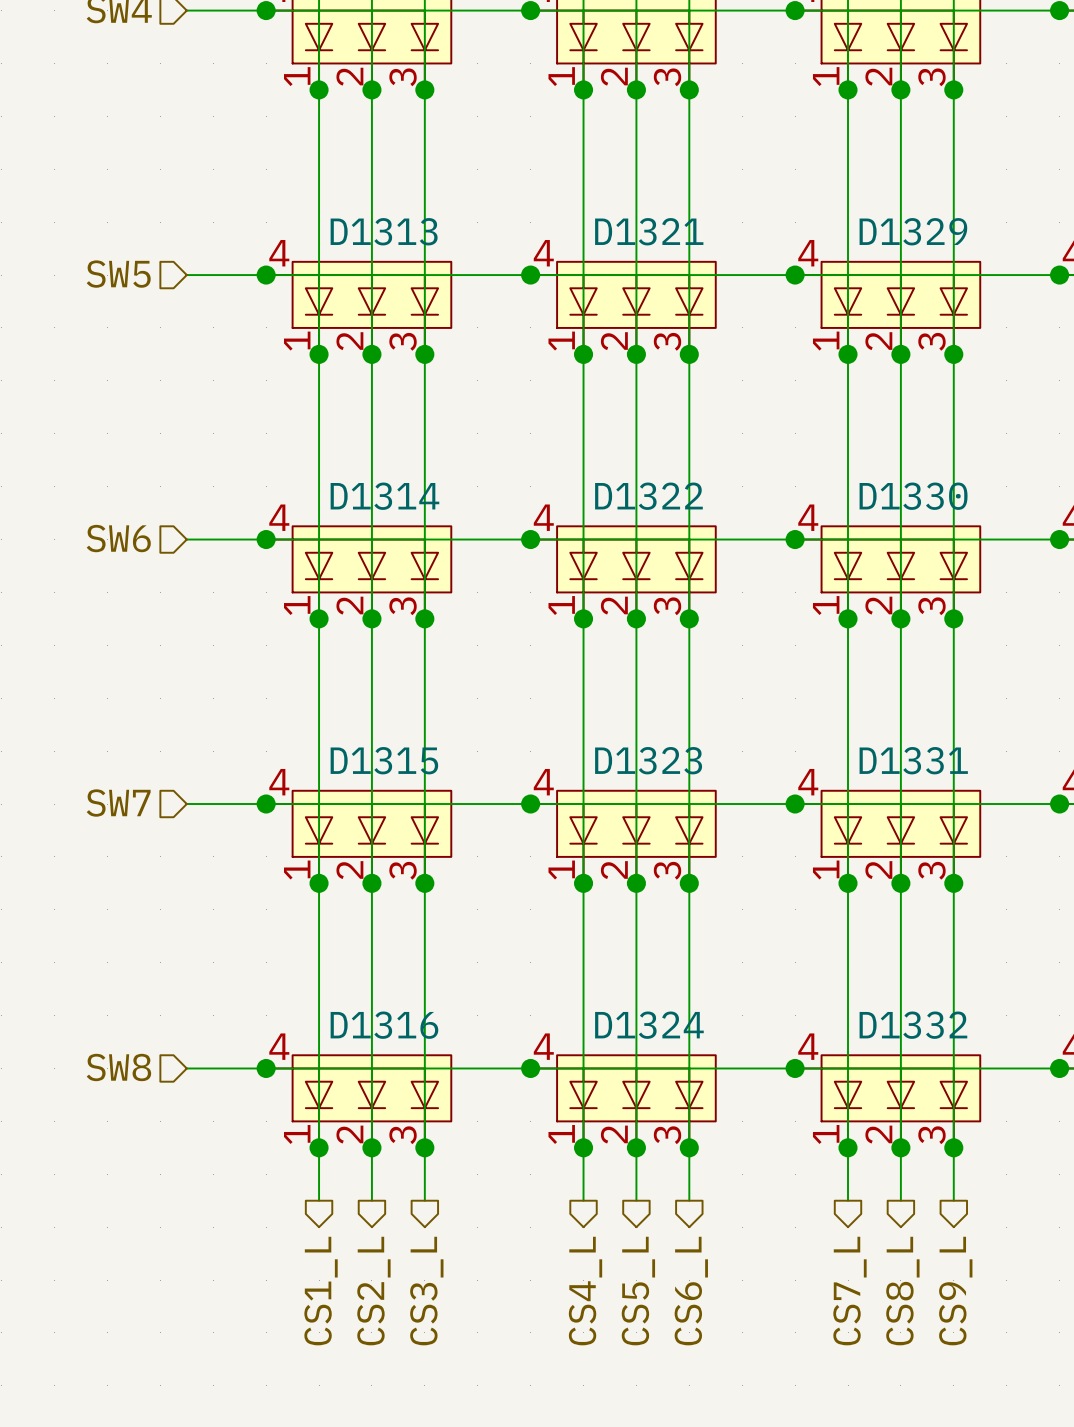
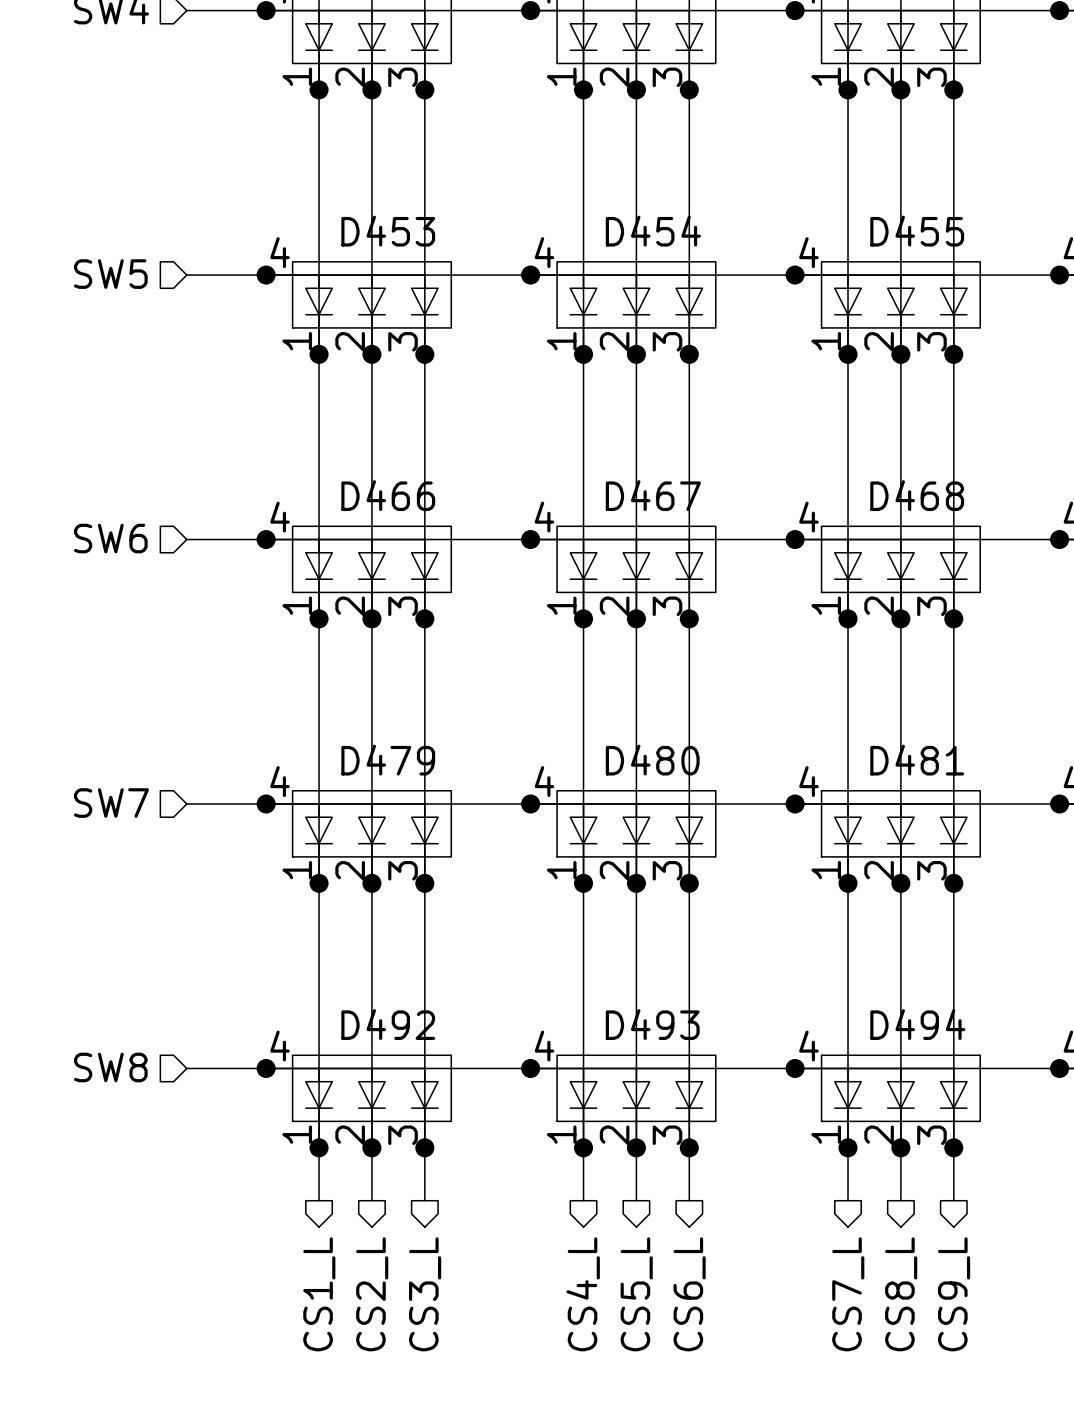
D1313 name: D1313 (384, 231) -> D453 (388, 231)
D1321 name: D1321 (649, 231) -> D454 (653, 231)
D1329 name: D1329 (913, 231) -> D455 (917, 231)
D1314 name: D1314 (384, 496) -> D466 (388, 495)
D1322 name: D1322 (648, 496) -> D467 (653, 495)
D1330 name: D1330 (913, 496) -> D468 (917, 495)
D1315 name: D1315 (384, 760) -> D479 (388, 760)
D1323 name: D1323 (648, 760) -> D480 (652, 760)
D1331 name: D1331 (913, 760) -> D481 (917, 760)
D1316 name: D1316 (384, 1025) -> D492 (388, 1024)
D1324 name: D1324 (649, 1025) -> D493 (652, 1024)
D1332 name: D1332 (913, 1025) -> D494 (917, 1024)

